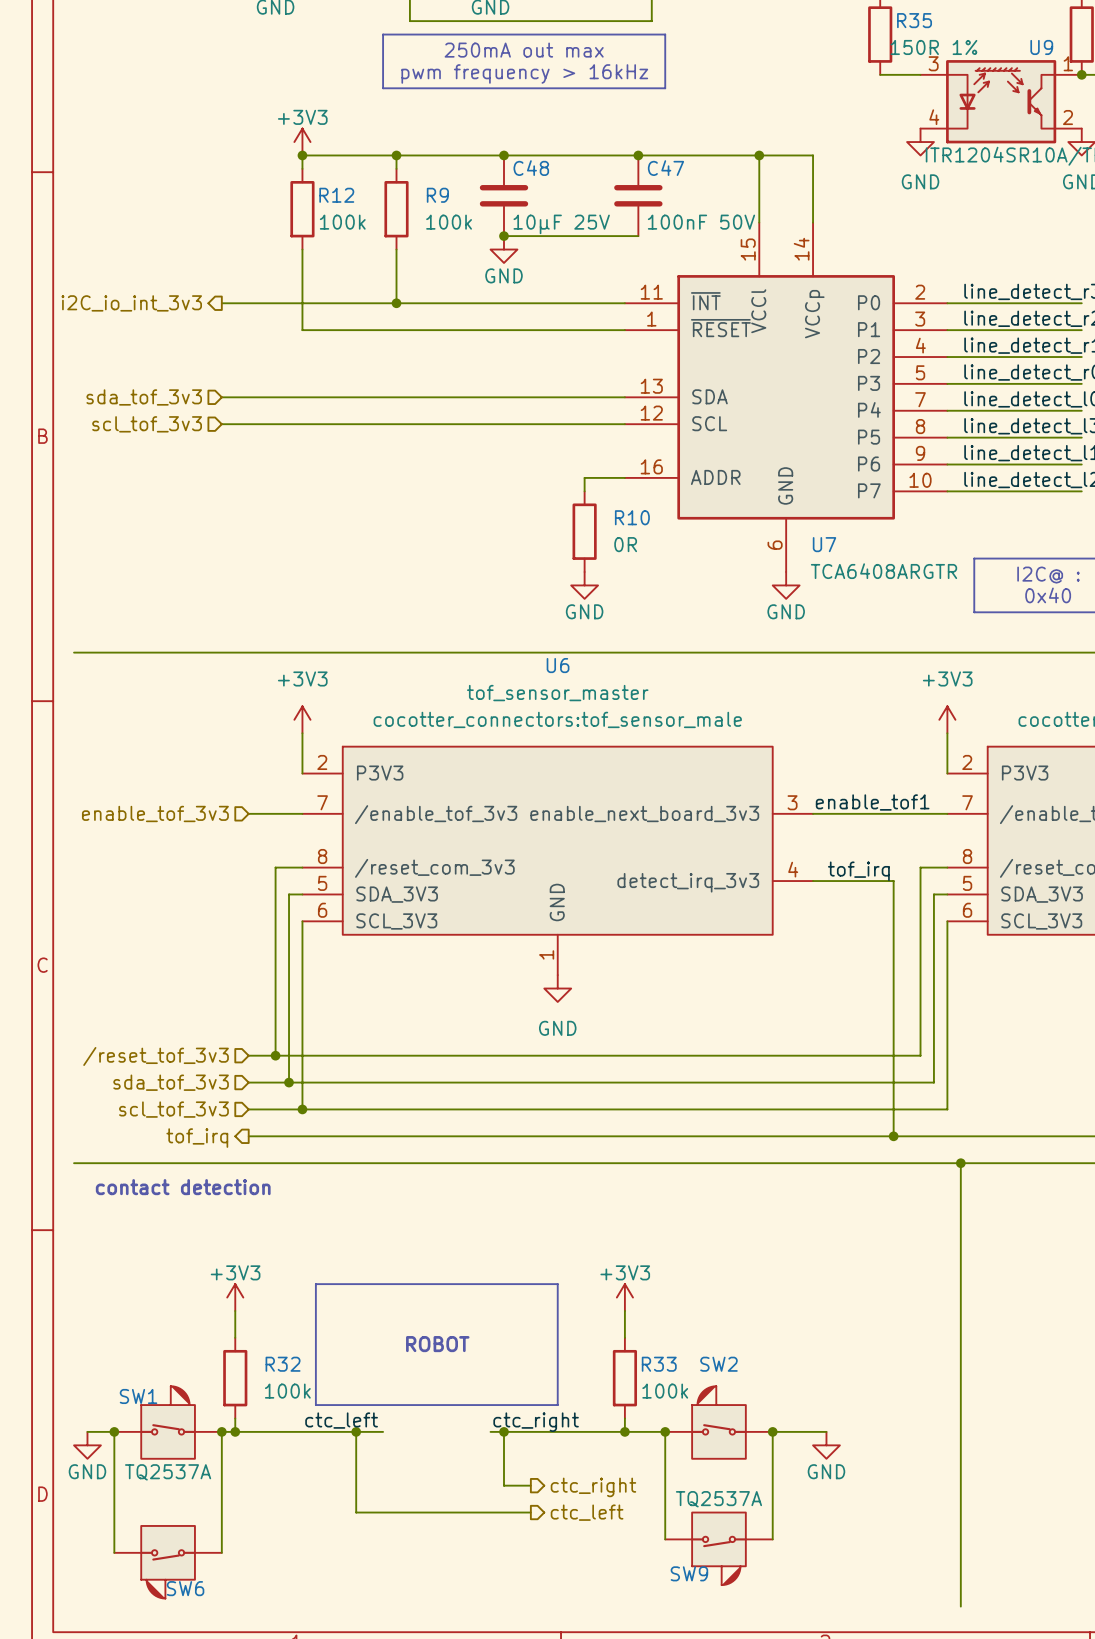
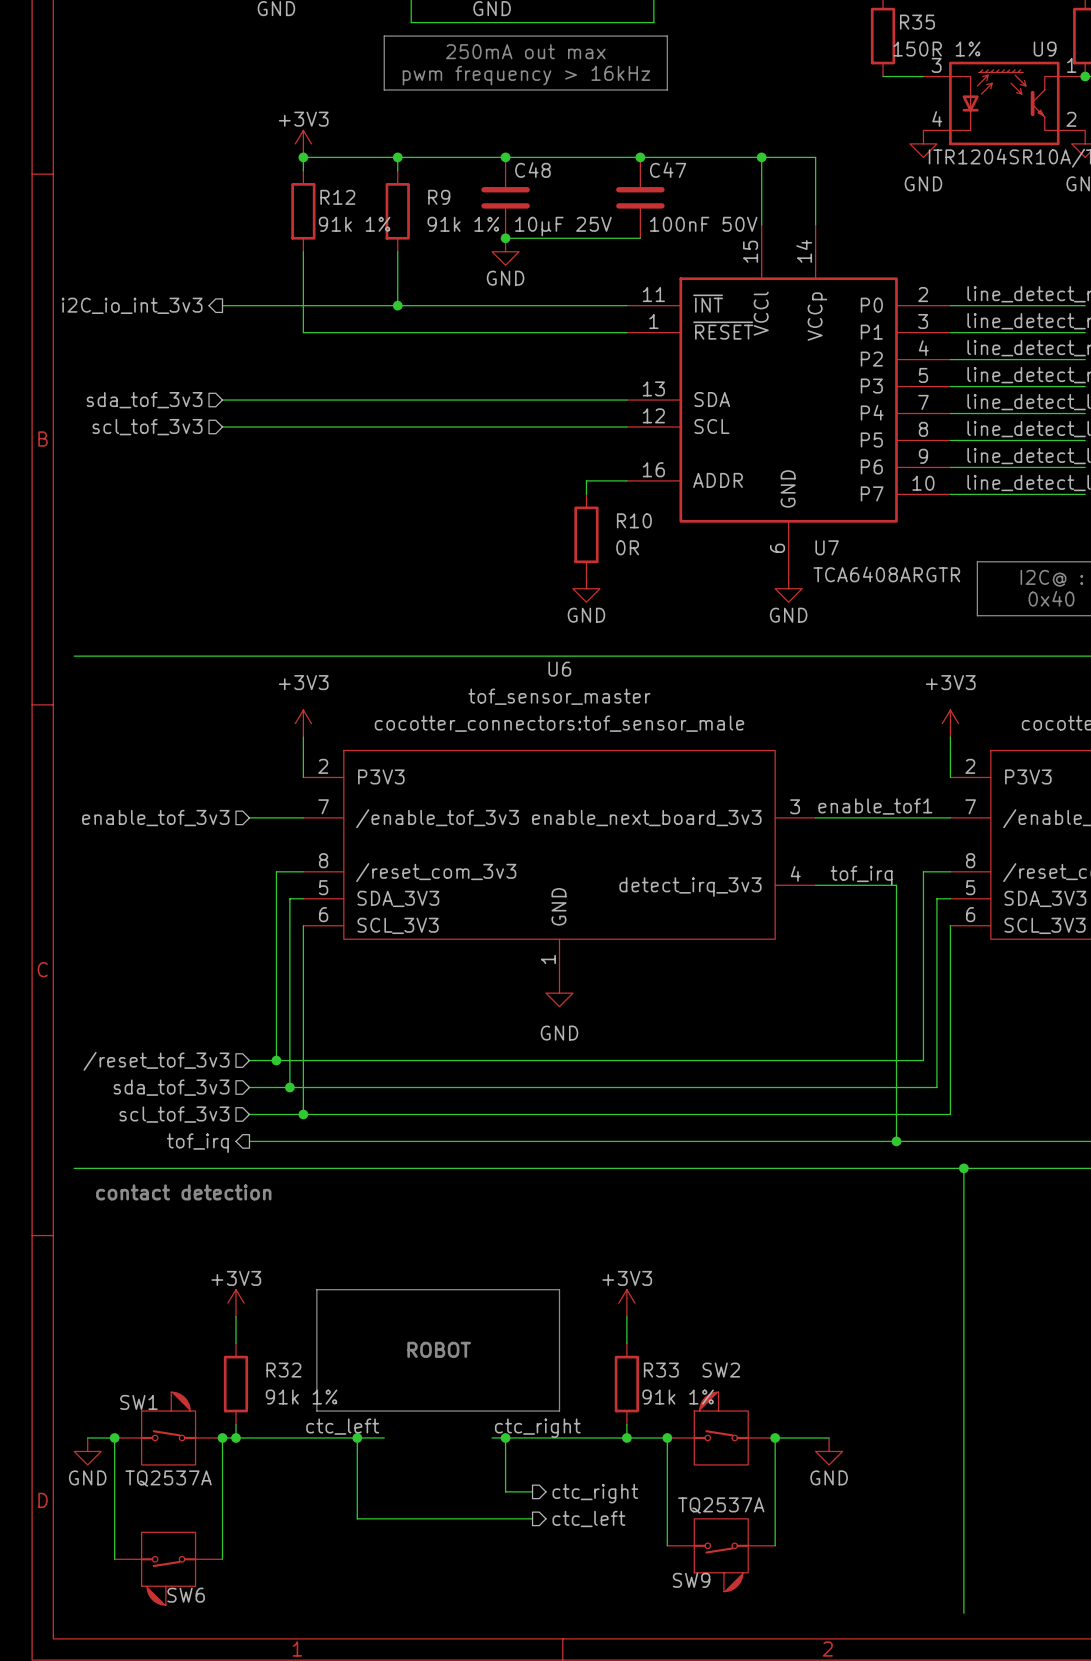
R12 value: 100k (342, 222) -> 91k 1% (354, 224)
R9 value: 100k (449, 222) -> 91k 1% (463, 224)
R32 value: 100k (287, 1391) -> 91k 1% (301, 1397)
R33 value: 100k (665, 1391) -> 91k 1% (678, 1397)

